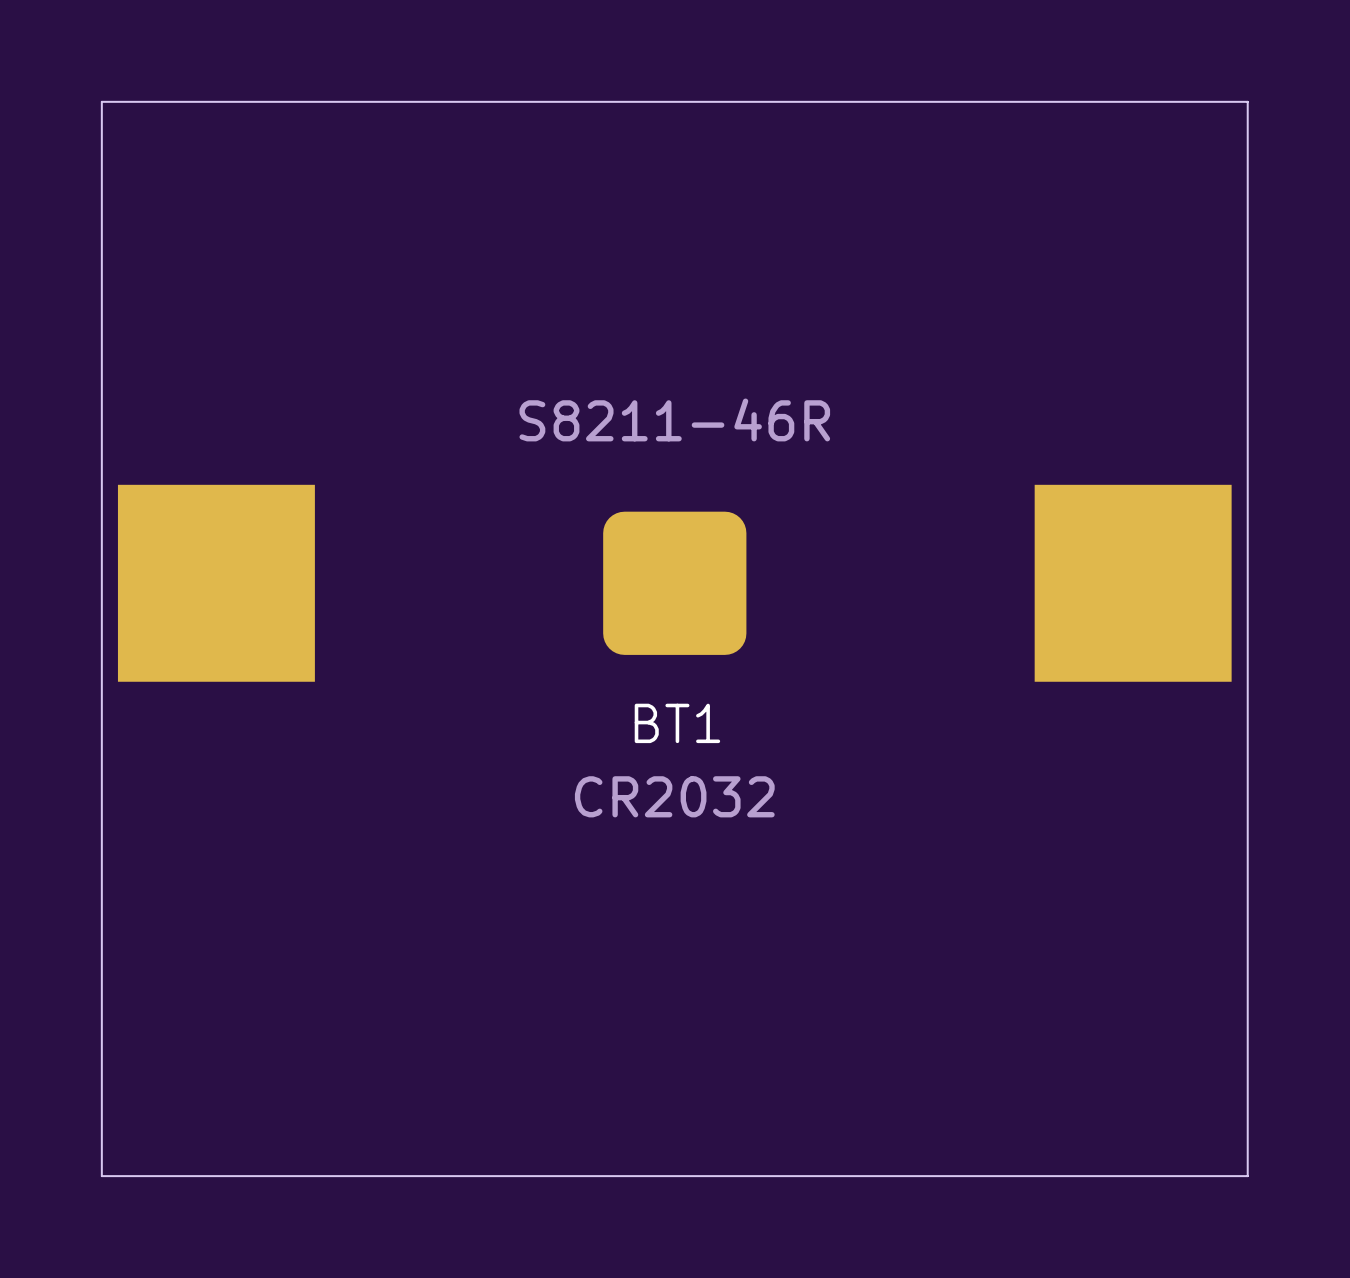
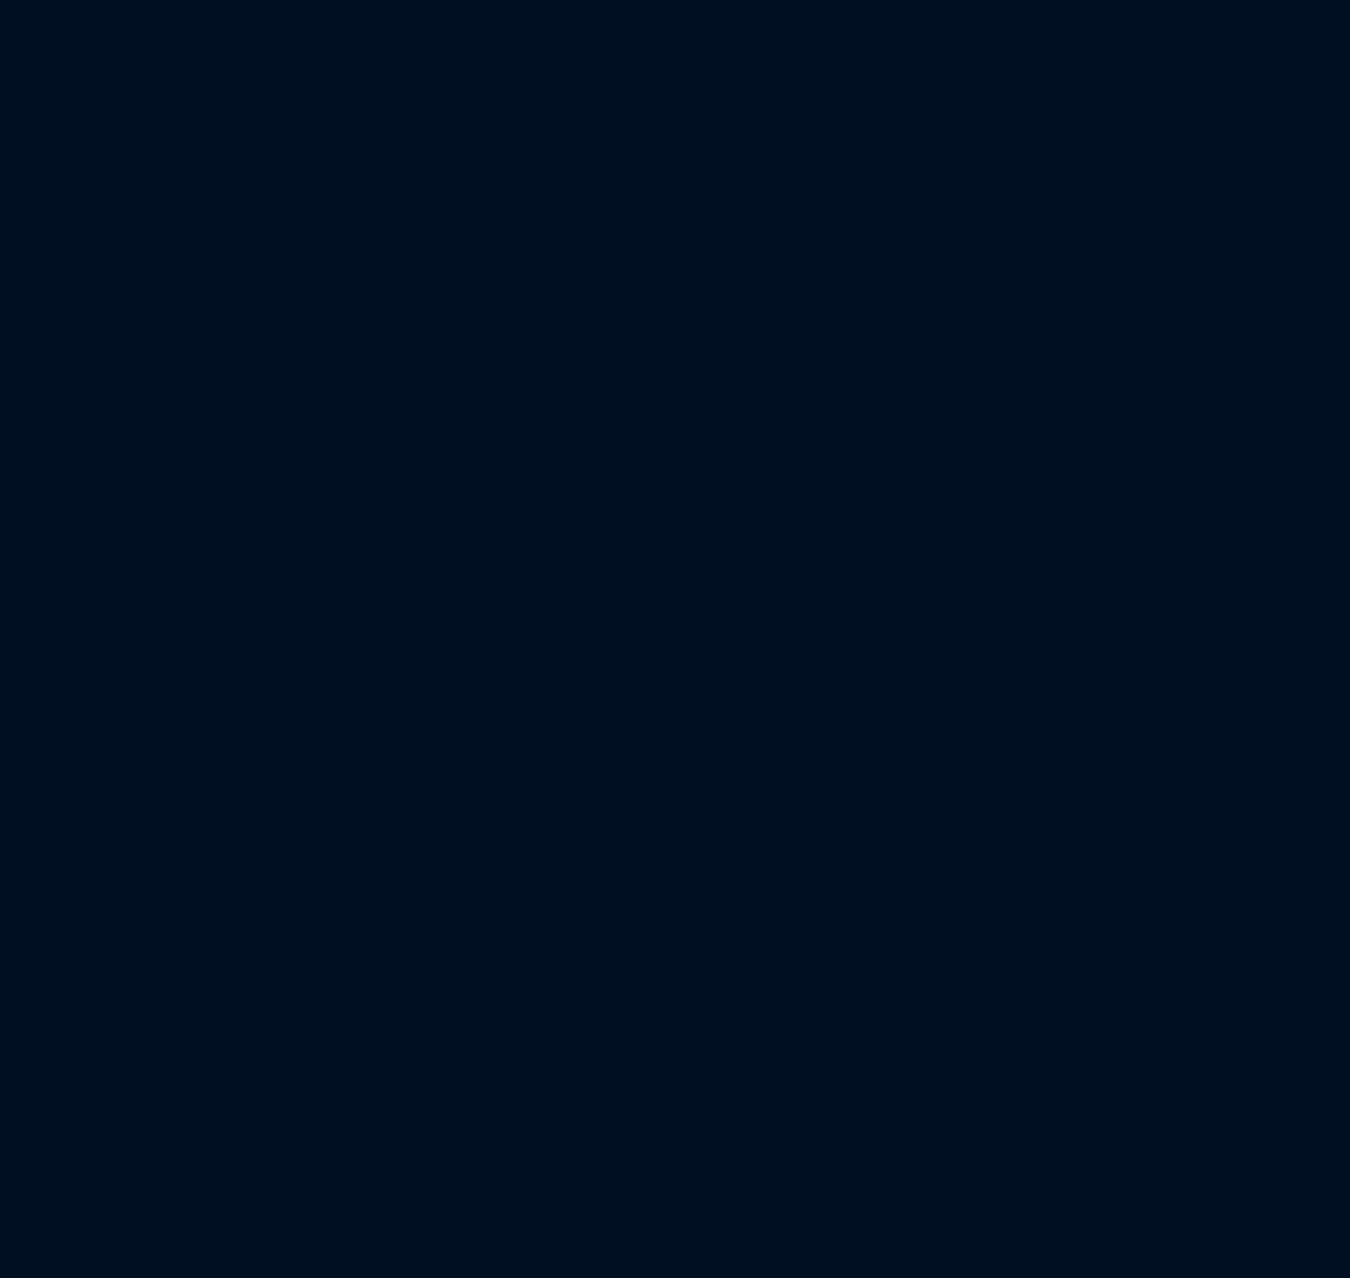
board edge: (1247, 101) (1247, 1176) (101, 1176) (101, 101) (1247, 101) -> none
BT1: CR2032 (674, 583) -> none

